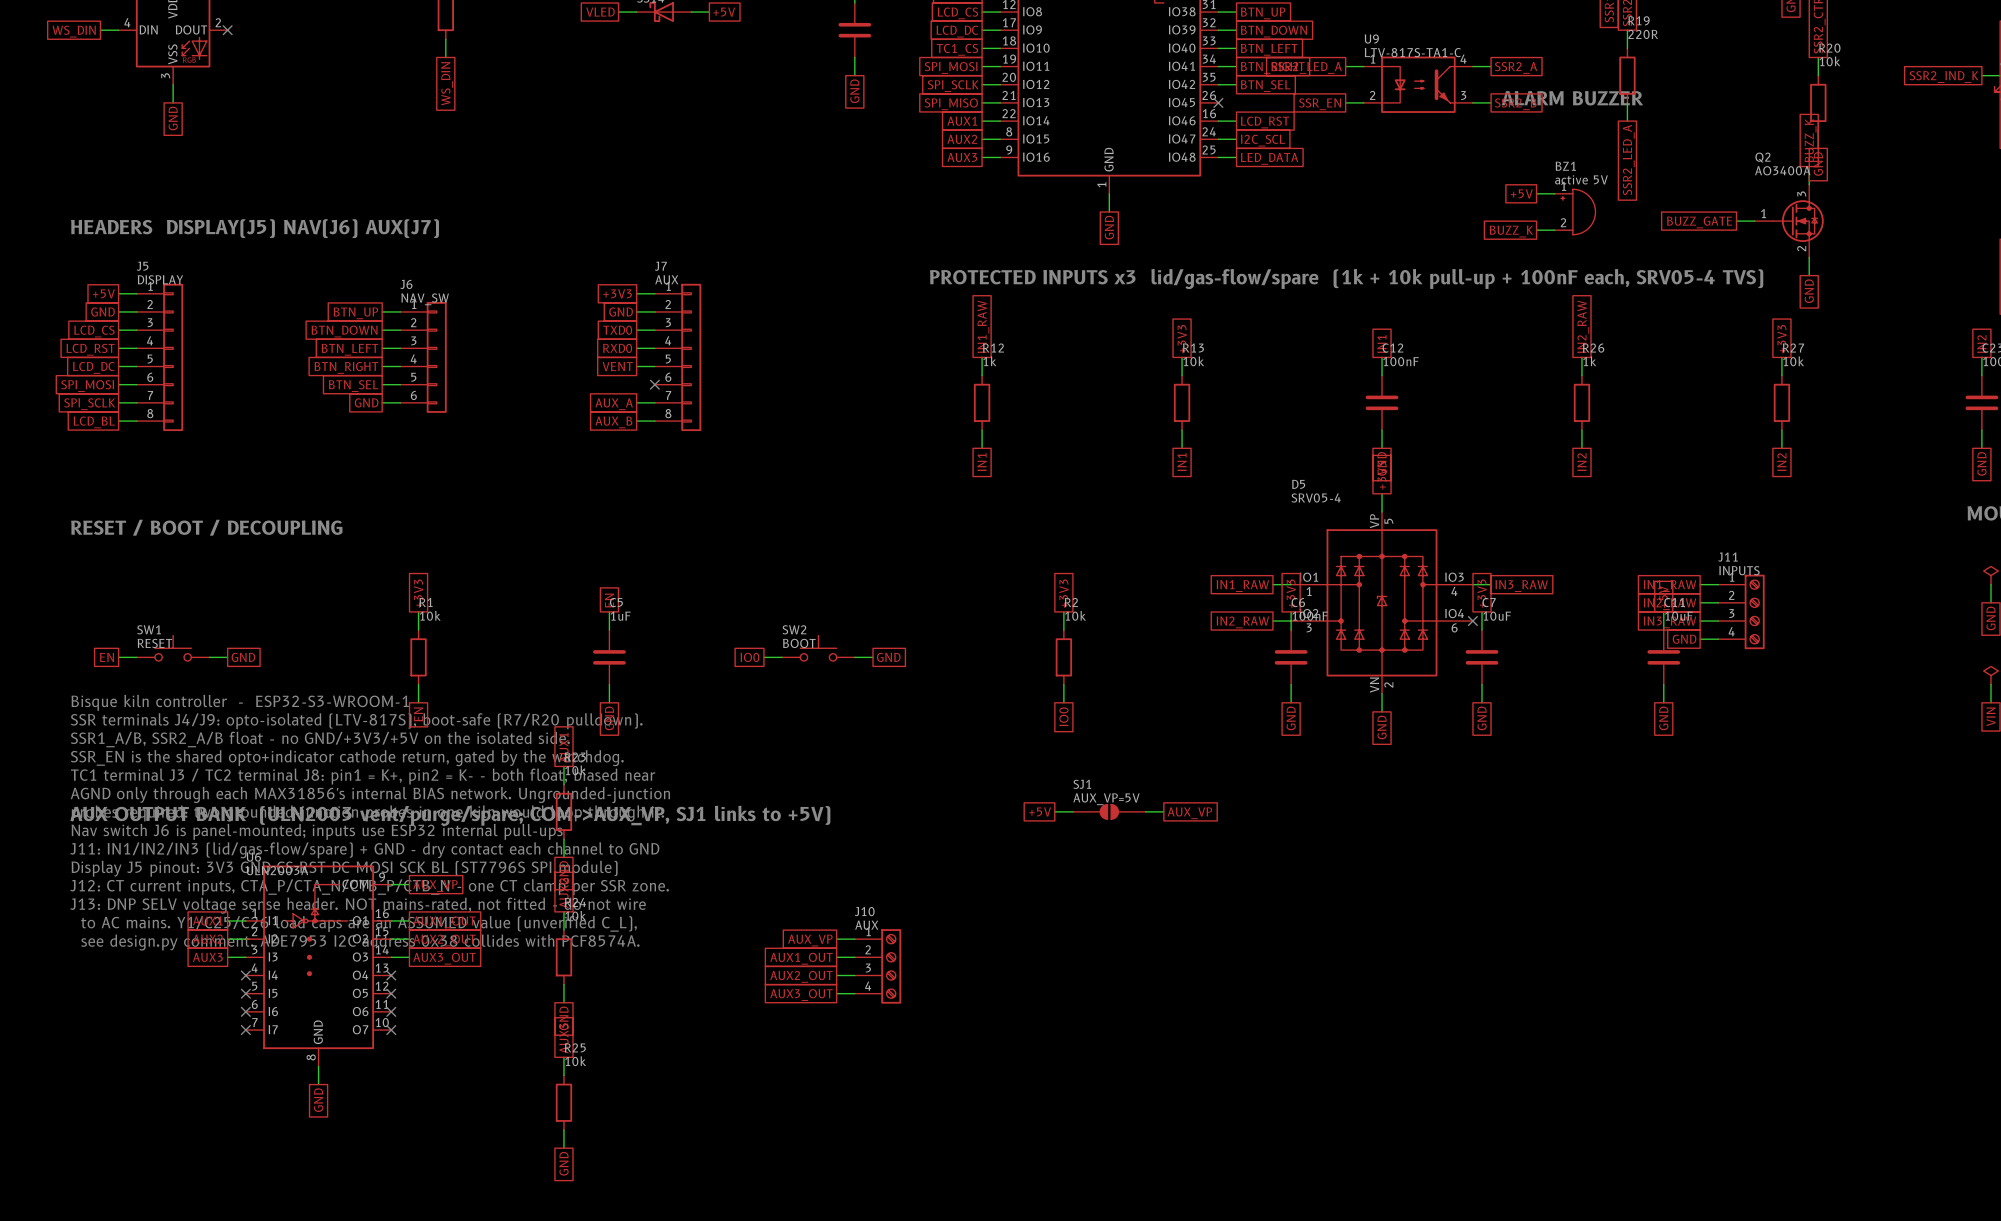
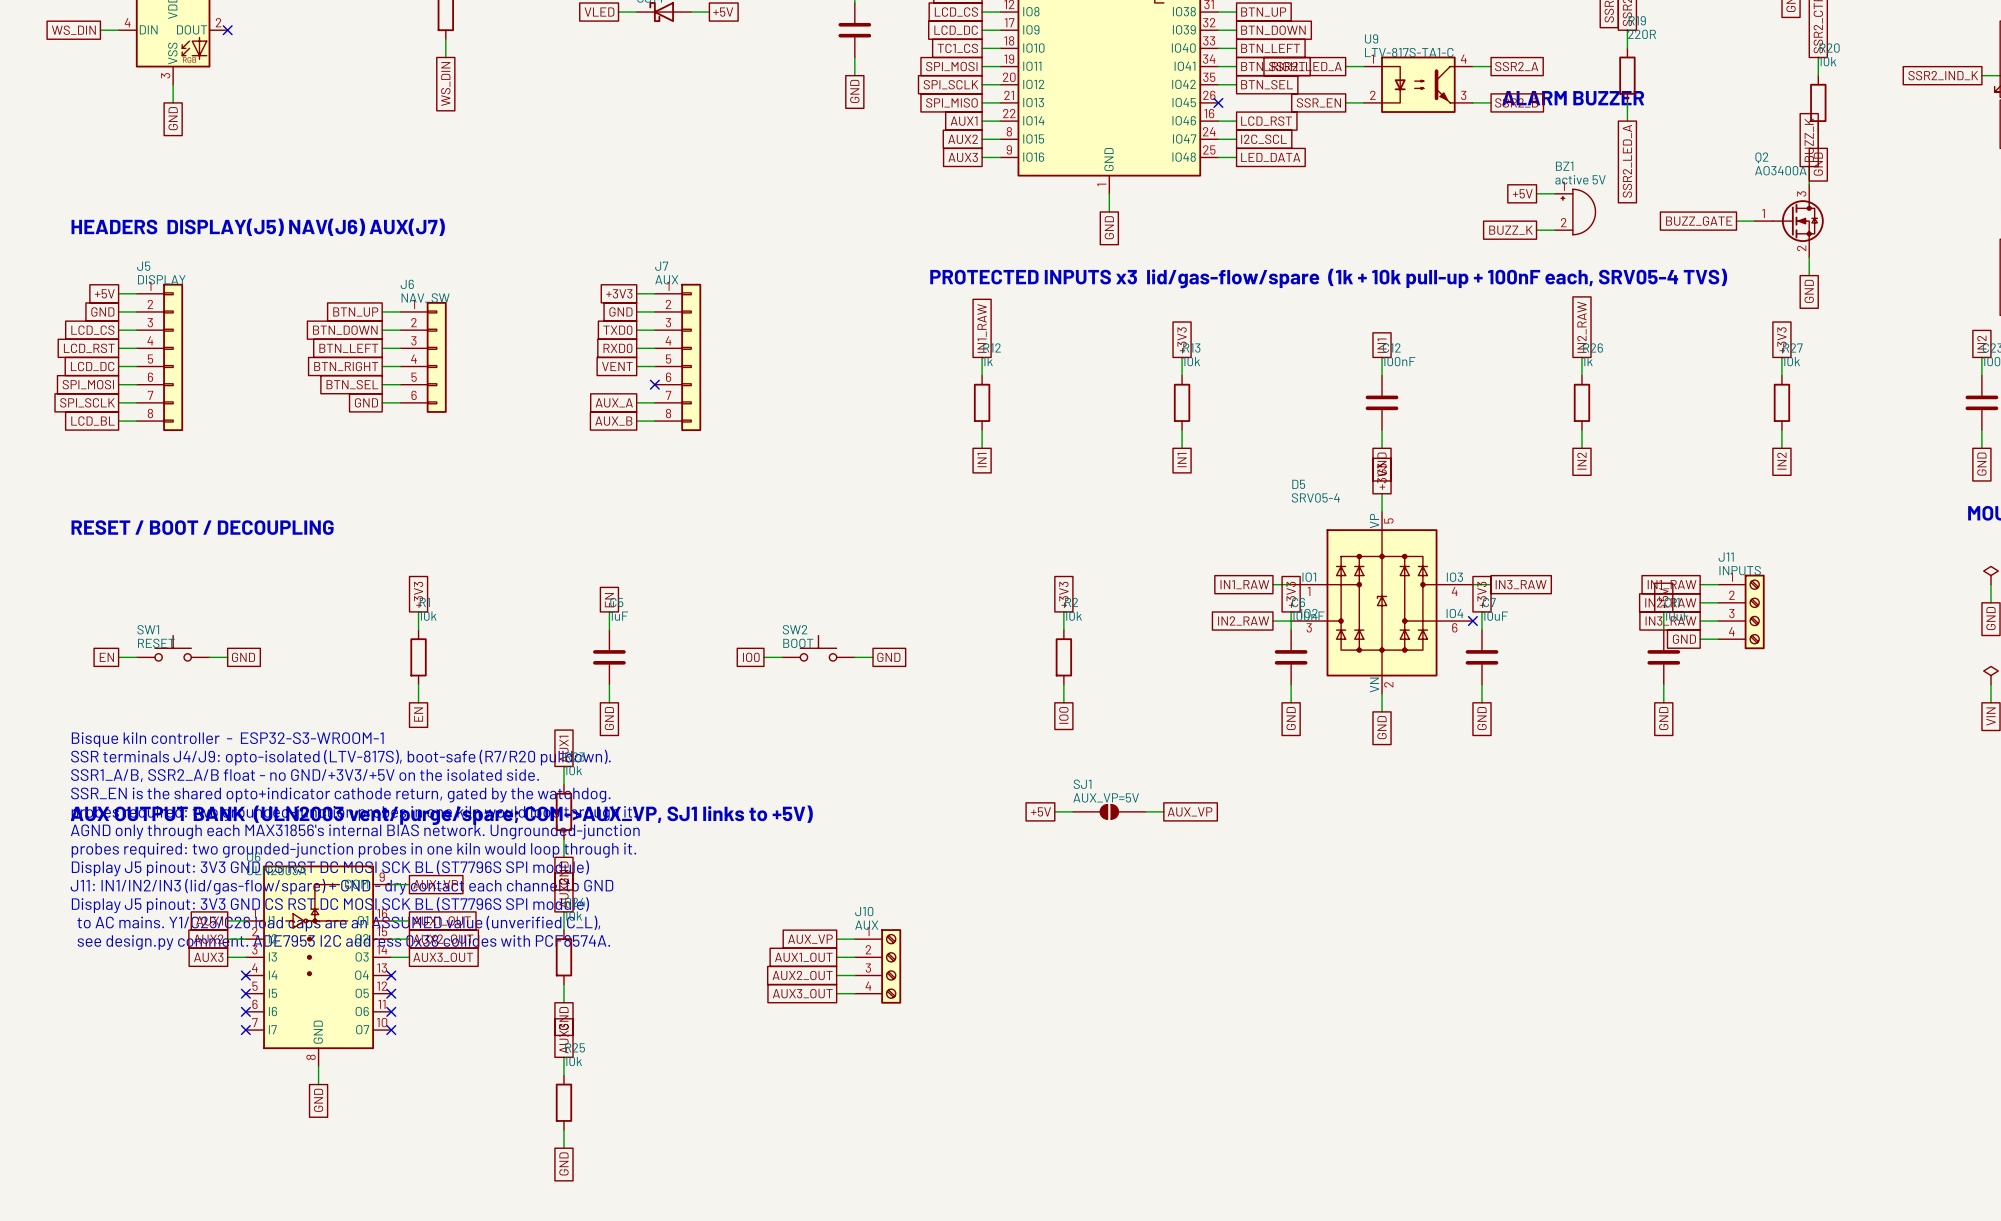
text: Bisque kiln controller - ESP32-S3-WROOM-1 (240, 702) -> none
text: SSR terminals J4/J9: opto-isolated (LTV-817S), boot-safe (R7/R20 pulldown). (356, 721) -> none
text: SSR1_A/B, SSR2_A/B float - no GND/+3V3/+5V on the isolated side. (320, 739) -> Bisque kiln controller - ESP32-S3-WROOM-1 (227, 739)
text: SSR_EN is the shared opto+indicator cathode return, gated by the watchdog. (347, 758) -> SSR terminals J4/J9: opto-isolated (LTV-817S), boot-safe (R7/R20 pulldown). (340, 757)
text: TC1 terminal J3 / TC2 terminal J8: pin1 = K+, pin2 = K- - both float, biased near (363, 776) -> SSR1_A/B, SSR2_A/B float - no GND/+3V3/+5V on the isolated side. (305, 775)
text: AGND only through each MAX31856's internal BIAS network. Ungrounded-junction (370, 795) -> SSR_EN is the shared opto+indicator cathode return, gated by the watchdog. (340, 795)
text: Nav switch J6 is panel-mounted; inputs use ESP32 internal pull-ups (317, 831) -> AGND only through each MAX31856's internal BIAS network. Ungrounded-junction (355, 831)
text: J11: IN1/IN2/IN3 (lid/gas-flow/spare) + GND - dry contact each channel to GND (364, 850) -> probes required: two grounded-junction probes in one kiln would loop through it. (353, 850)
text: J12: CT current inputs, CTA_P/CTA_N/CTB_P/CTB_N - one CT clamp per SSR zone. (369, 887) -> J11: IN1/IN2/IN3 (lid/gas-flow/spare) + GND - dry contact each channel to GND (342, 886)
text: J13: DNP SELV voltage sense header. NOT mains-rated, not fitted - do not wire (358, 905) -> Display J5 pinout: 3V3 GND CS RST DC MOSI SCK BL (ST7796S SPI module) (330, 905)

